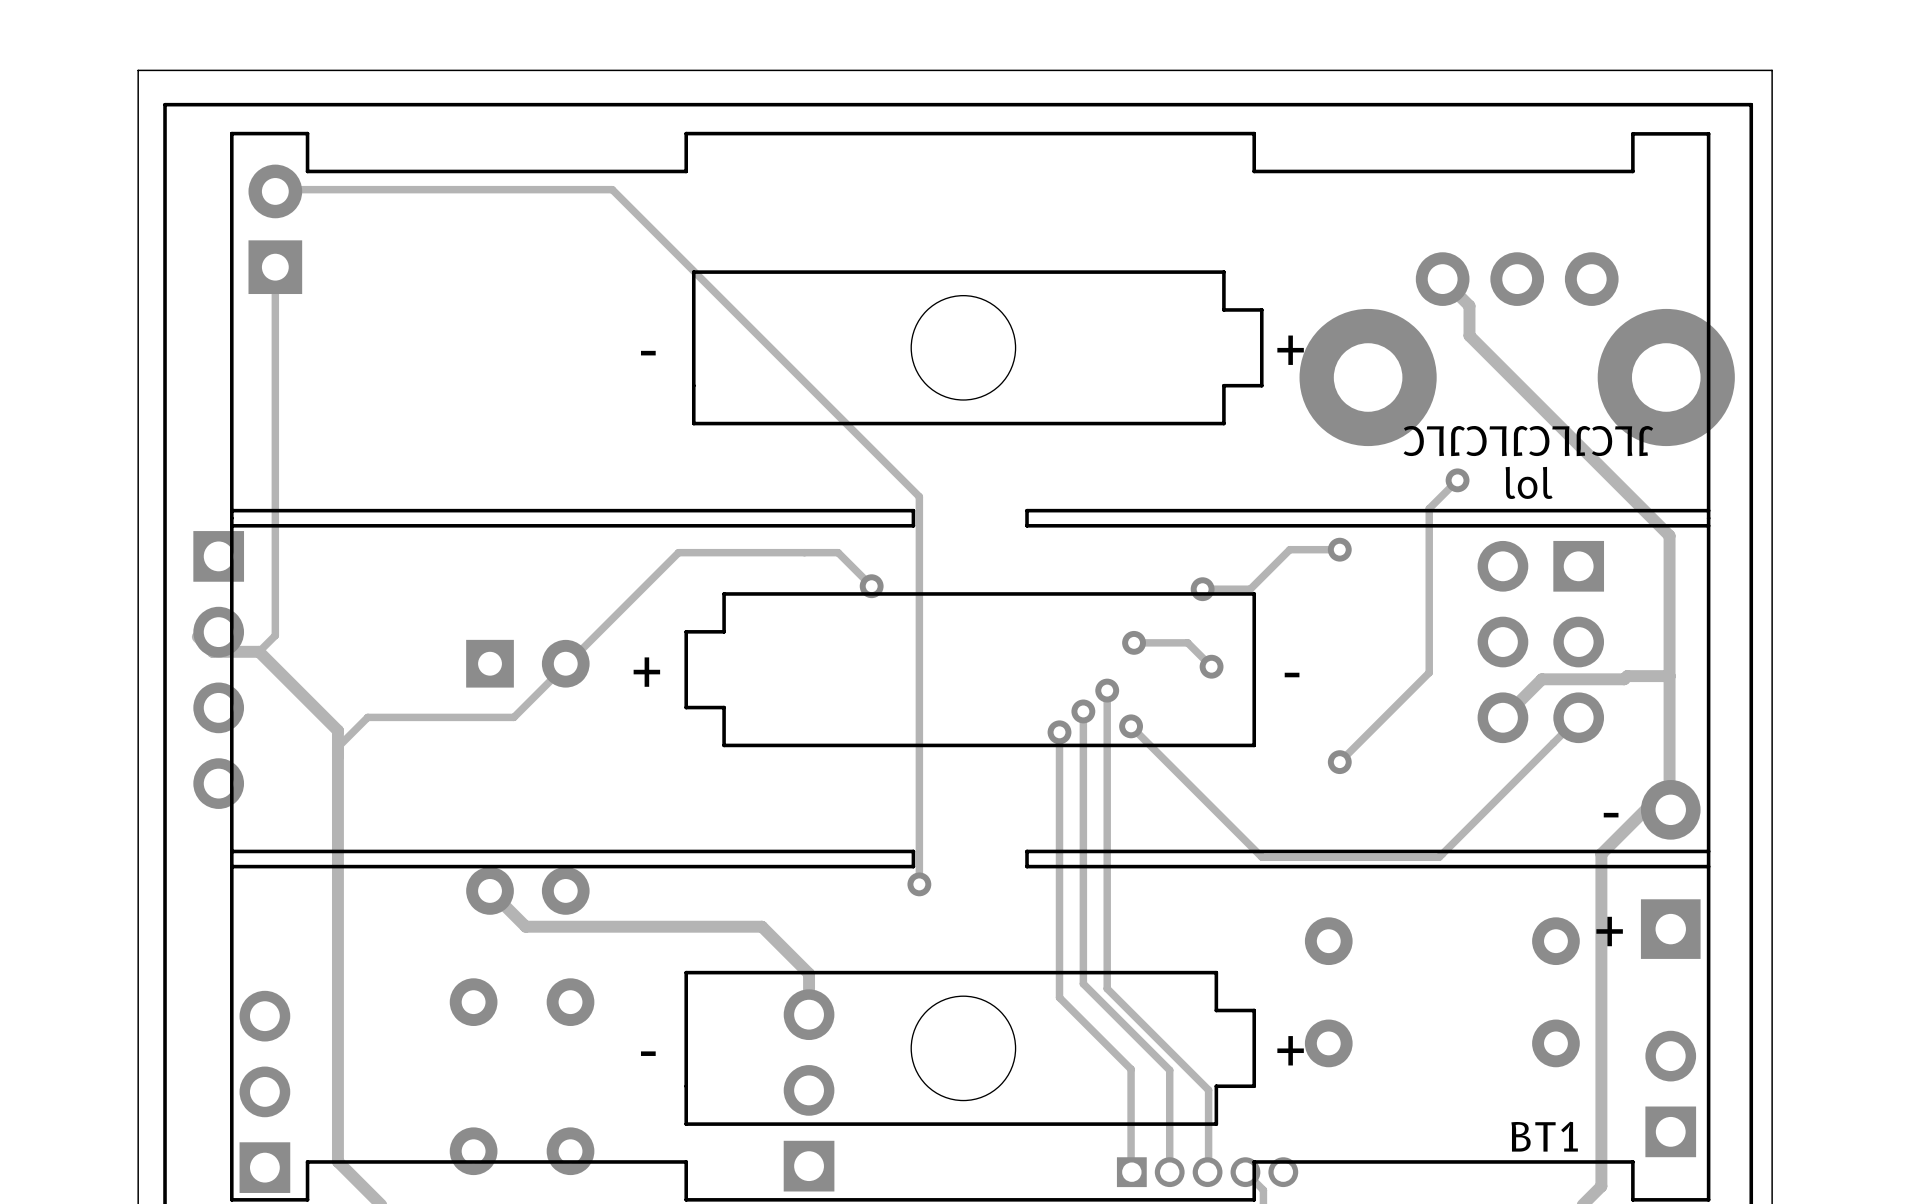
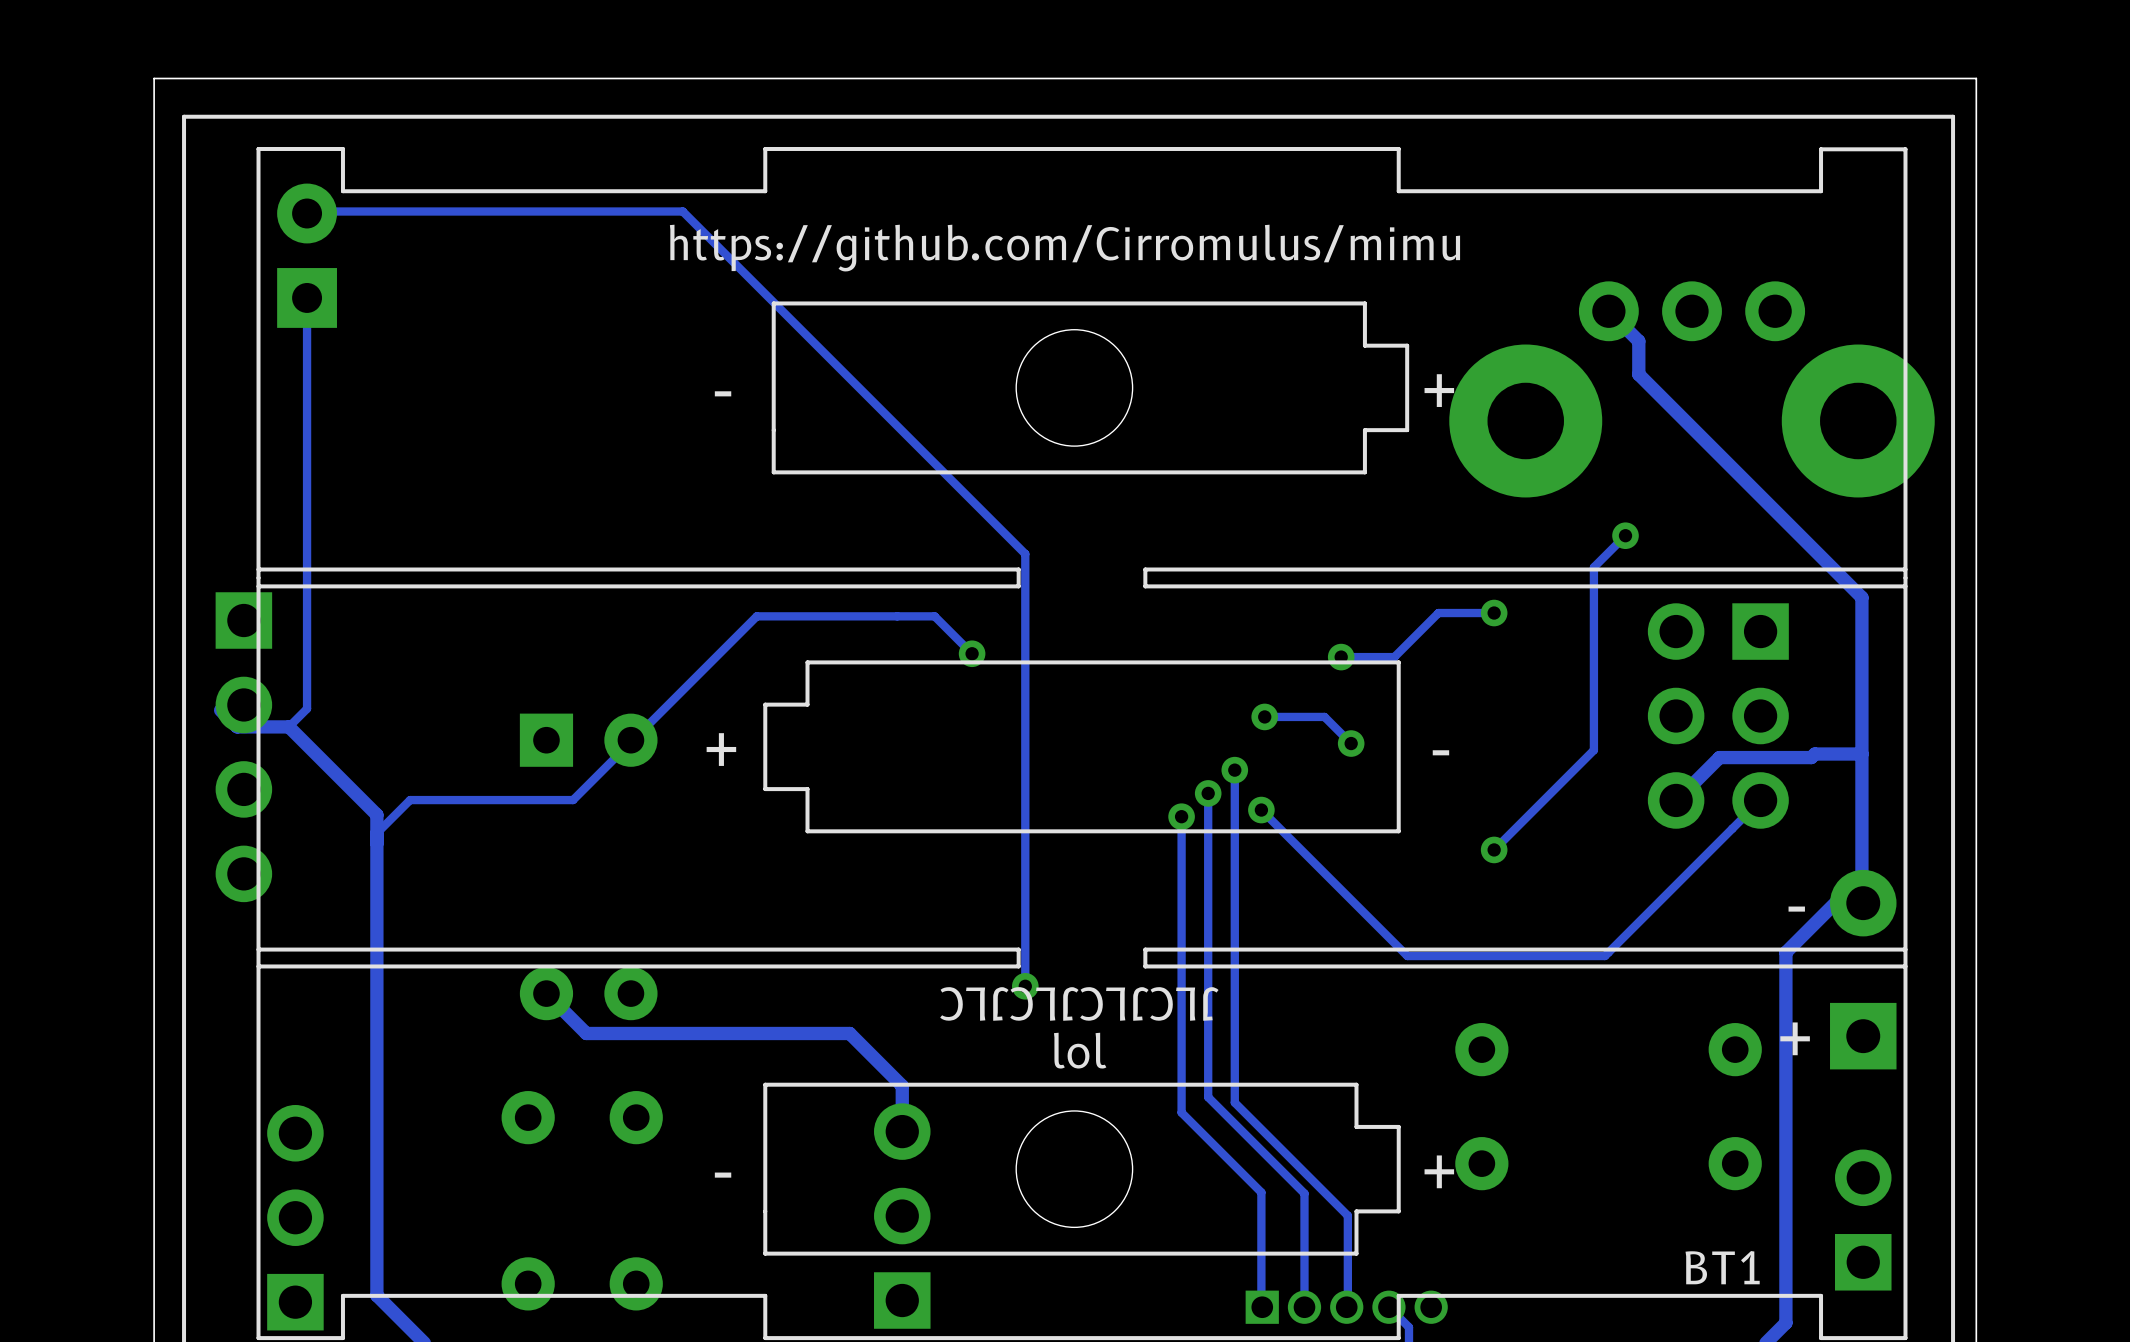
text: none -> https://github.com/Cirromulus/mimu (1064, 248)
text position: JLCJLCJLCJLC (1528, 441) -> JLCJLCJLCJLC (1079, 1003)
text position: lol (1529, 482) -> lol (1080, 1050)

